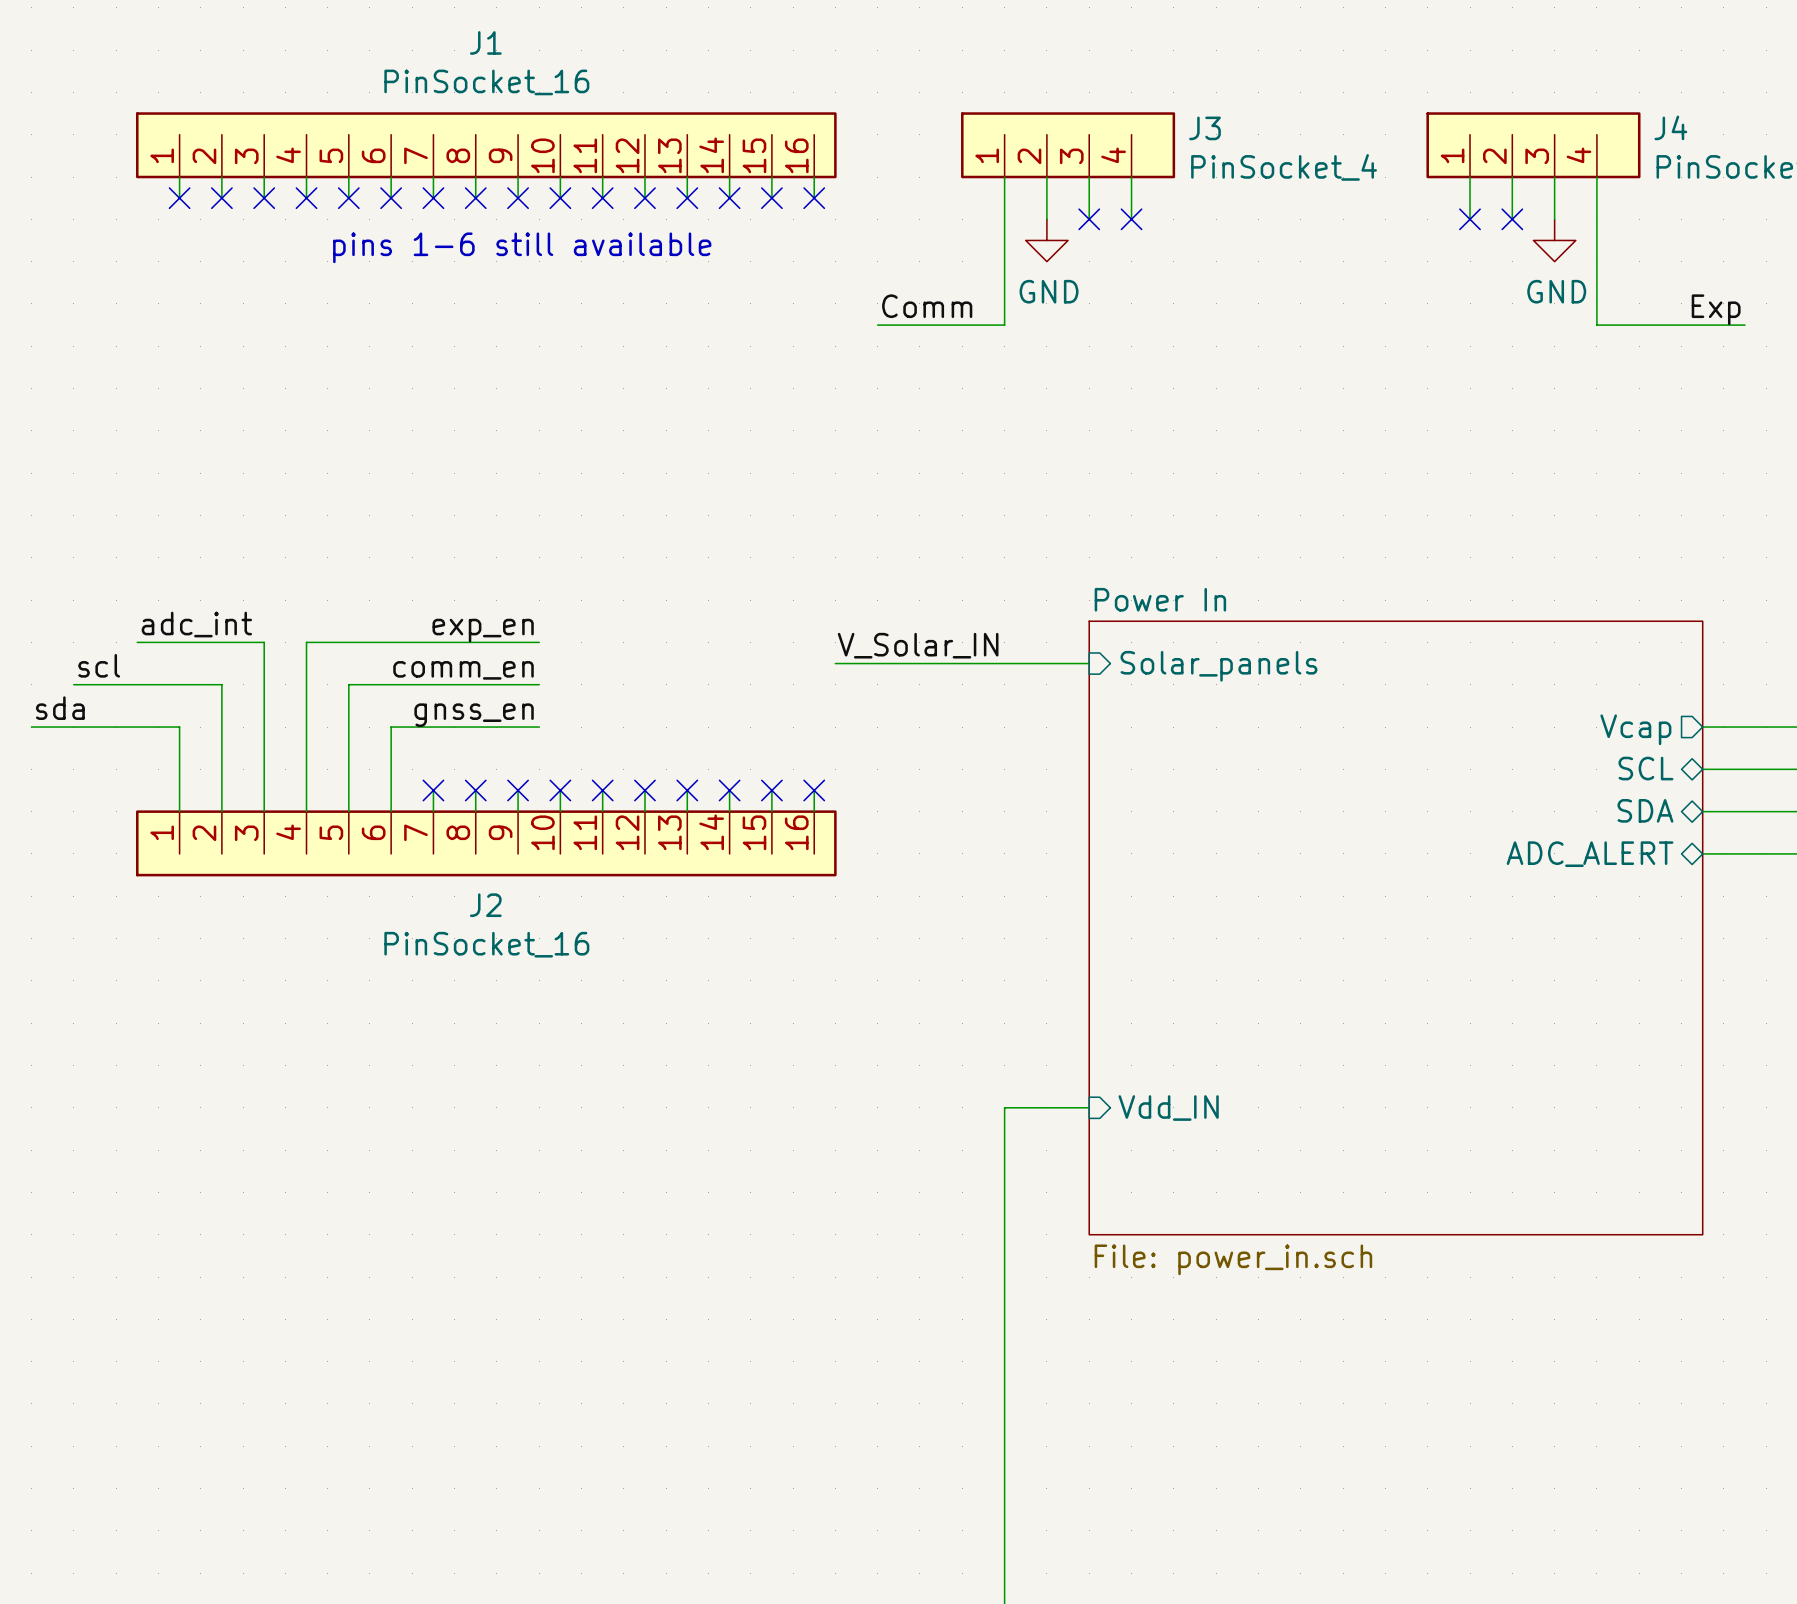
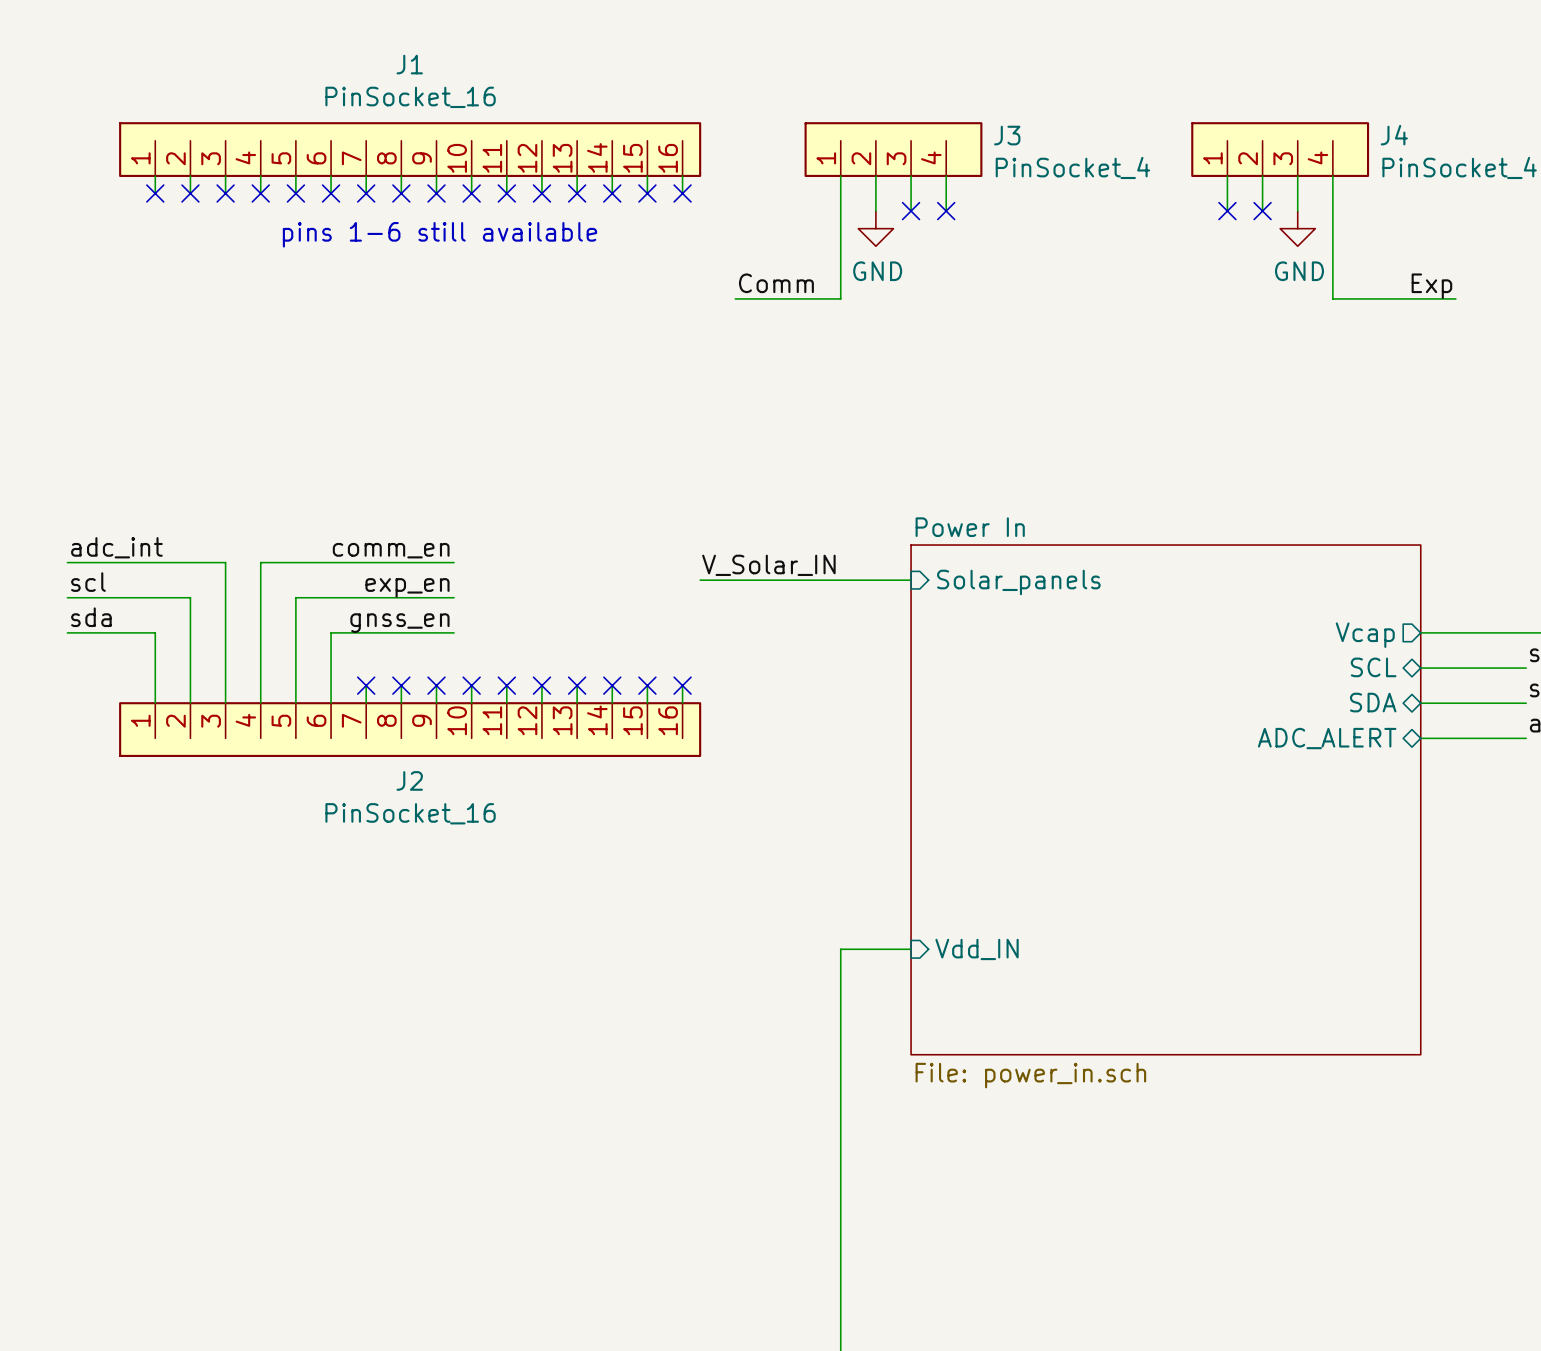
label position: adc_int (196, 624) -> adc_int (116, 547)
label: exp_en (483, 630) -> comm_en (391, 550)
wire: none -> (67, 562) (120, 562)
label: comm_en (463, 670) -> exp_en (407, 587)
label position: sda (60, 708) -> sda (91, 617)
wire: (31, 727) (73, 727) -> none

